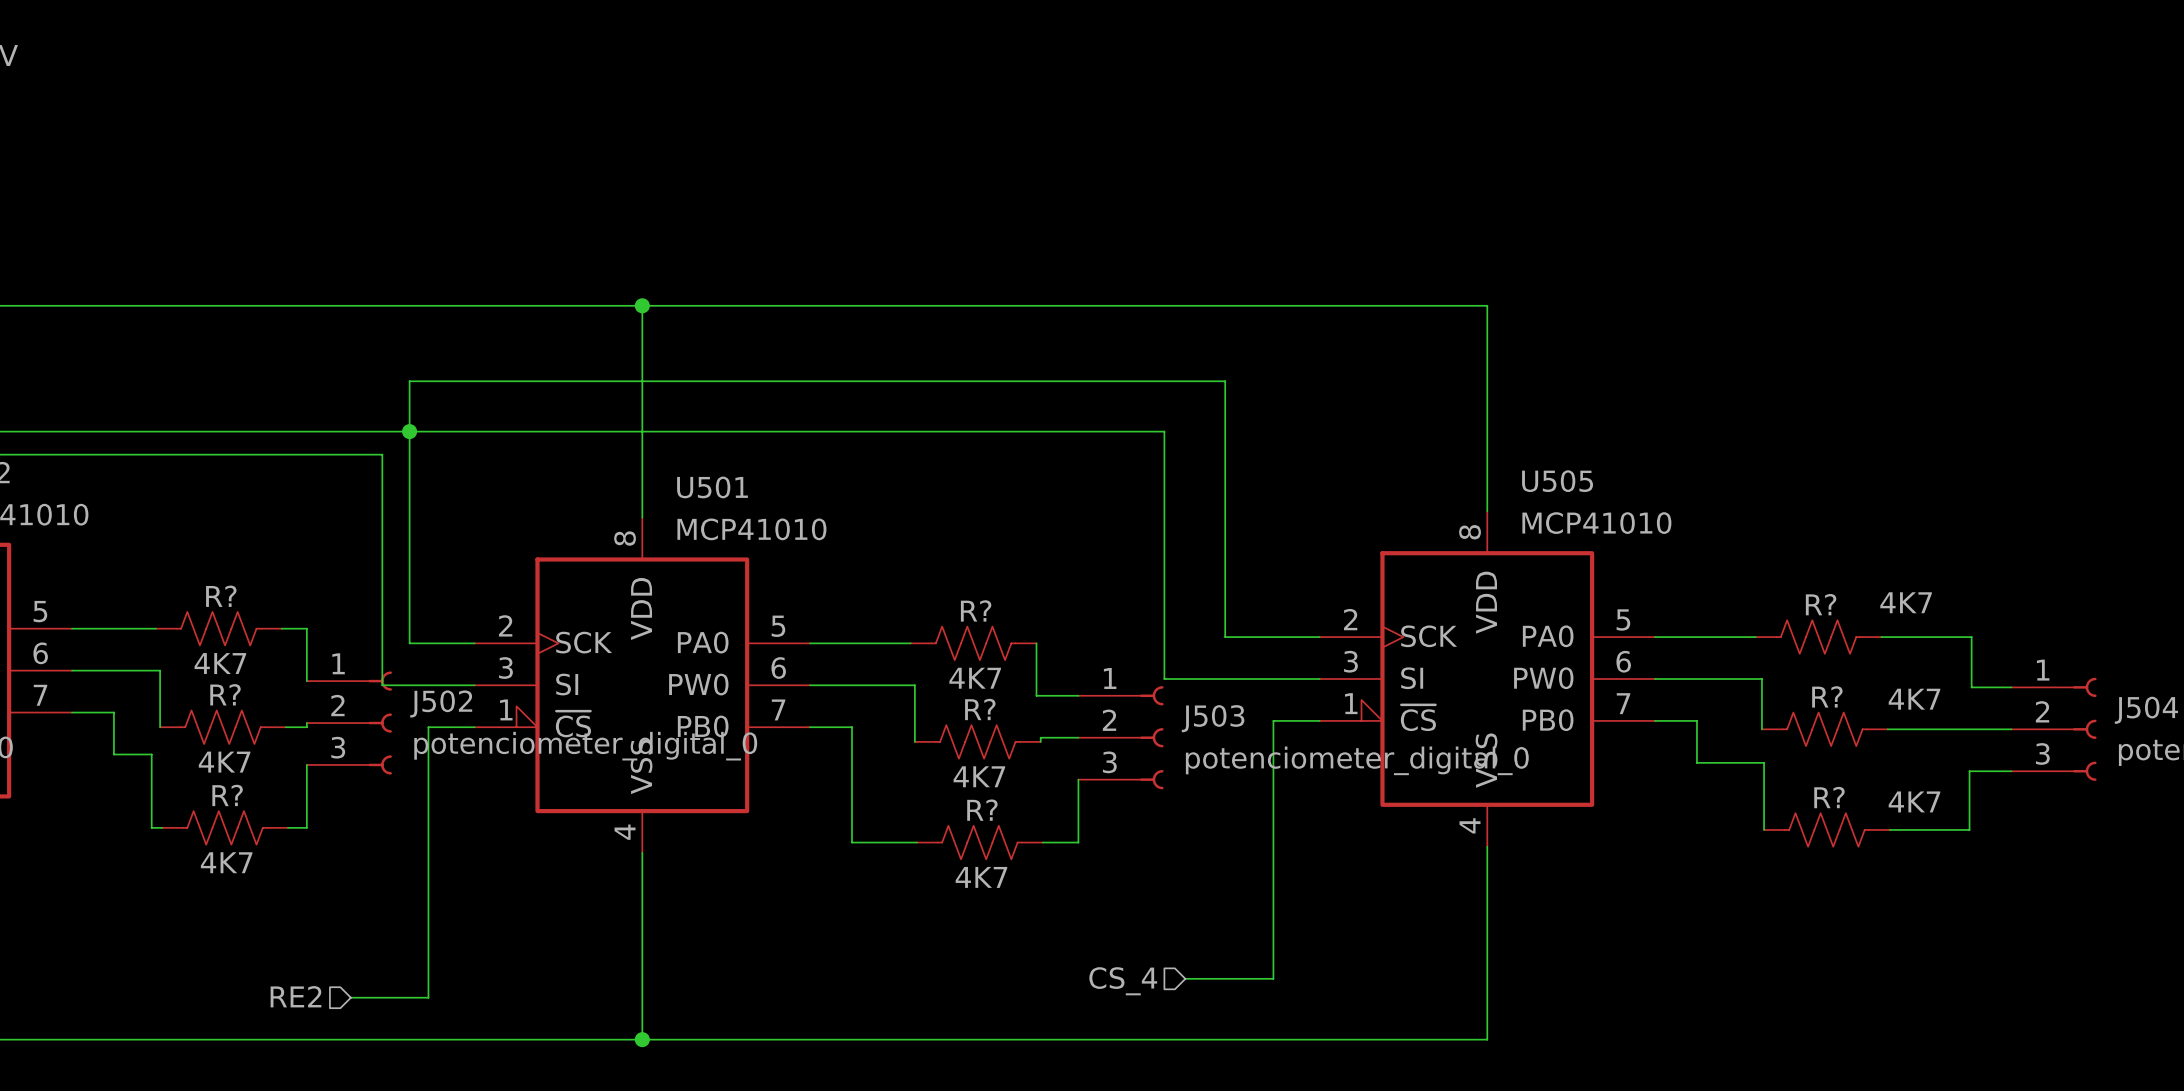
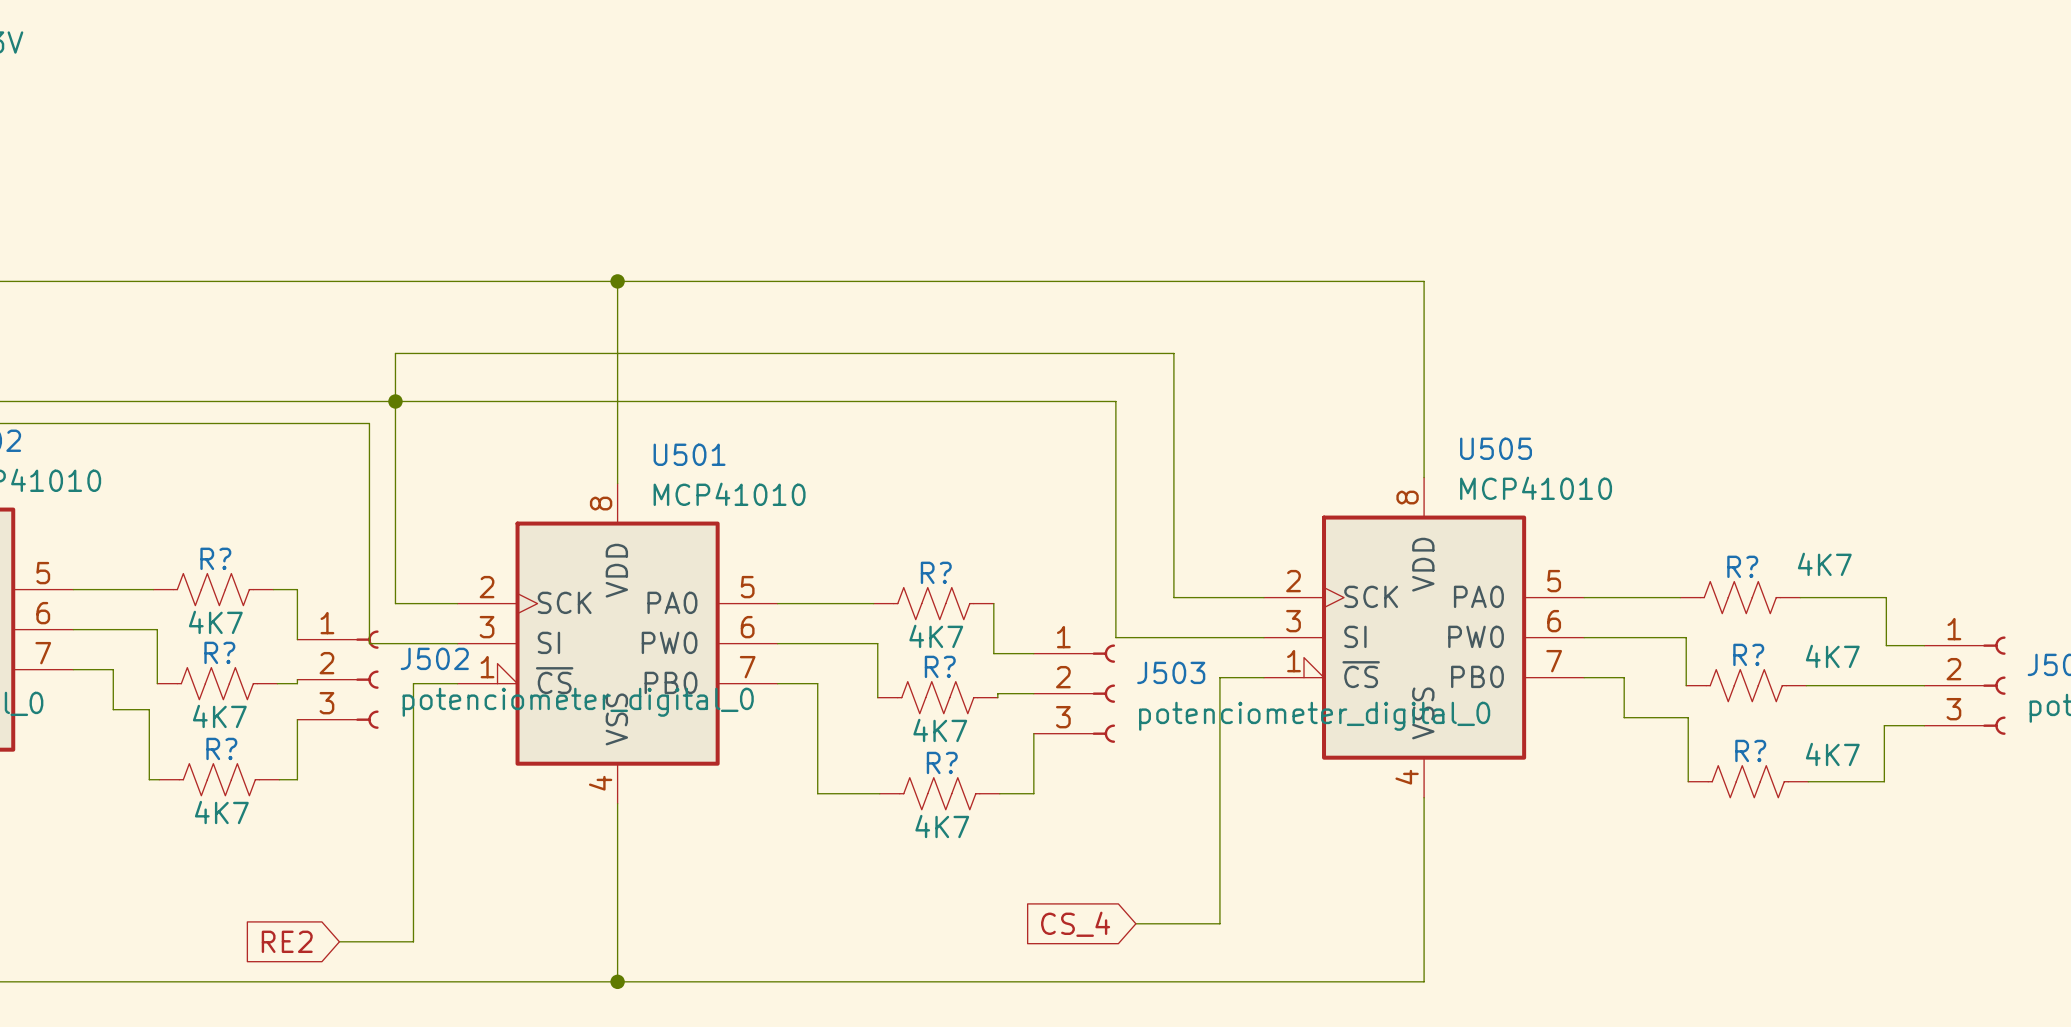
hierarchical label: CS_4 (1123, 981) -> none
global label: none -> CS_4 (1075, 924)
hierarchical label: RE2 (296, 996) -> none
global label: none -> RE2 (287, 941)

